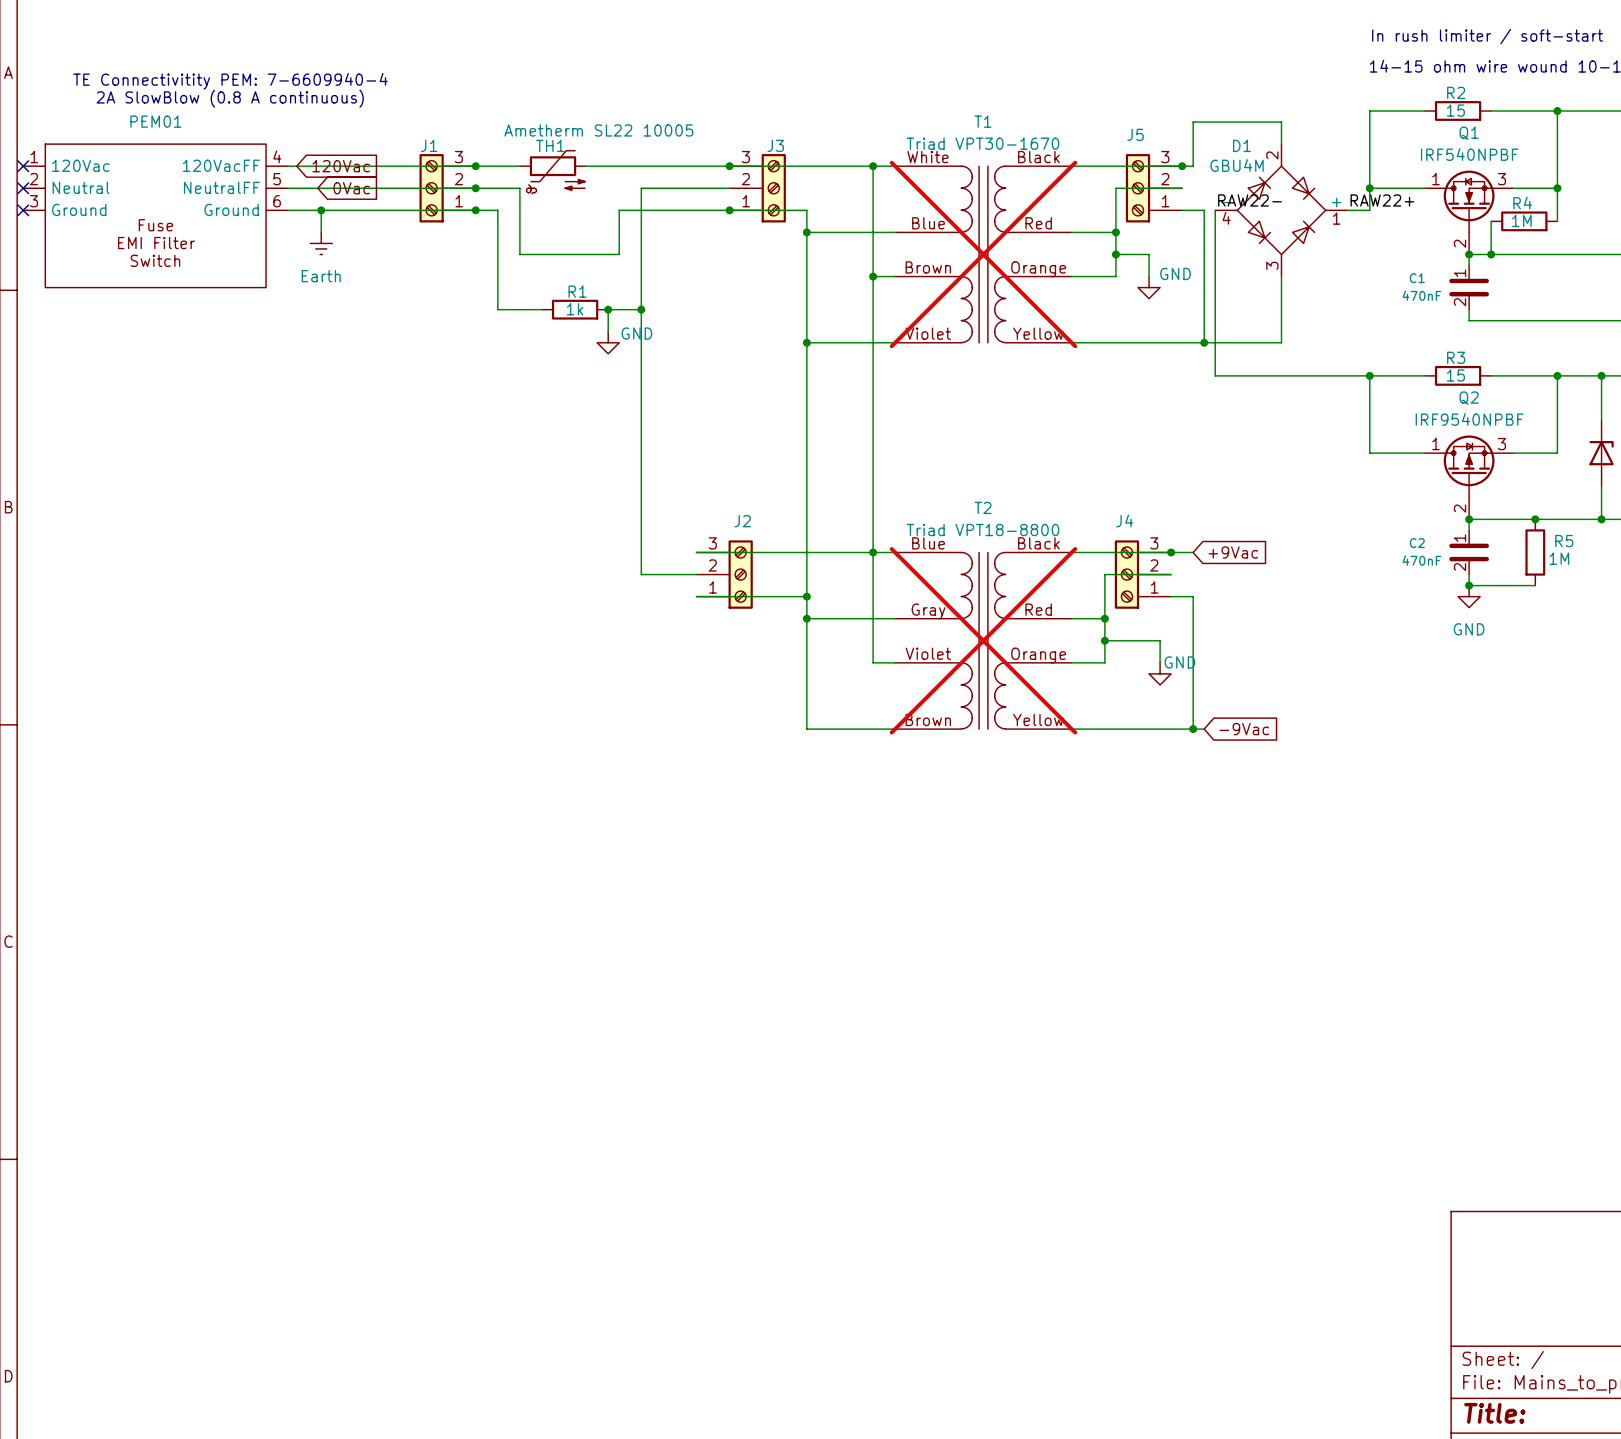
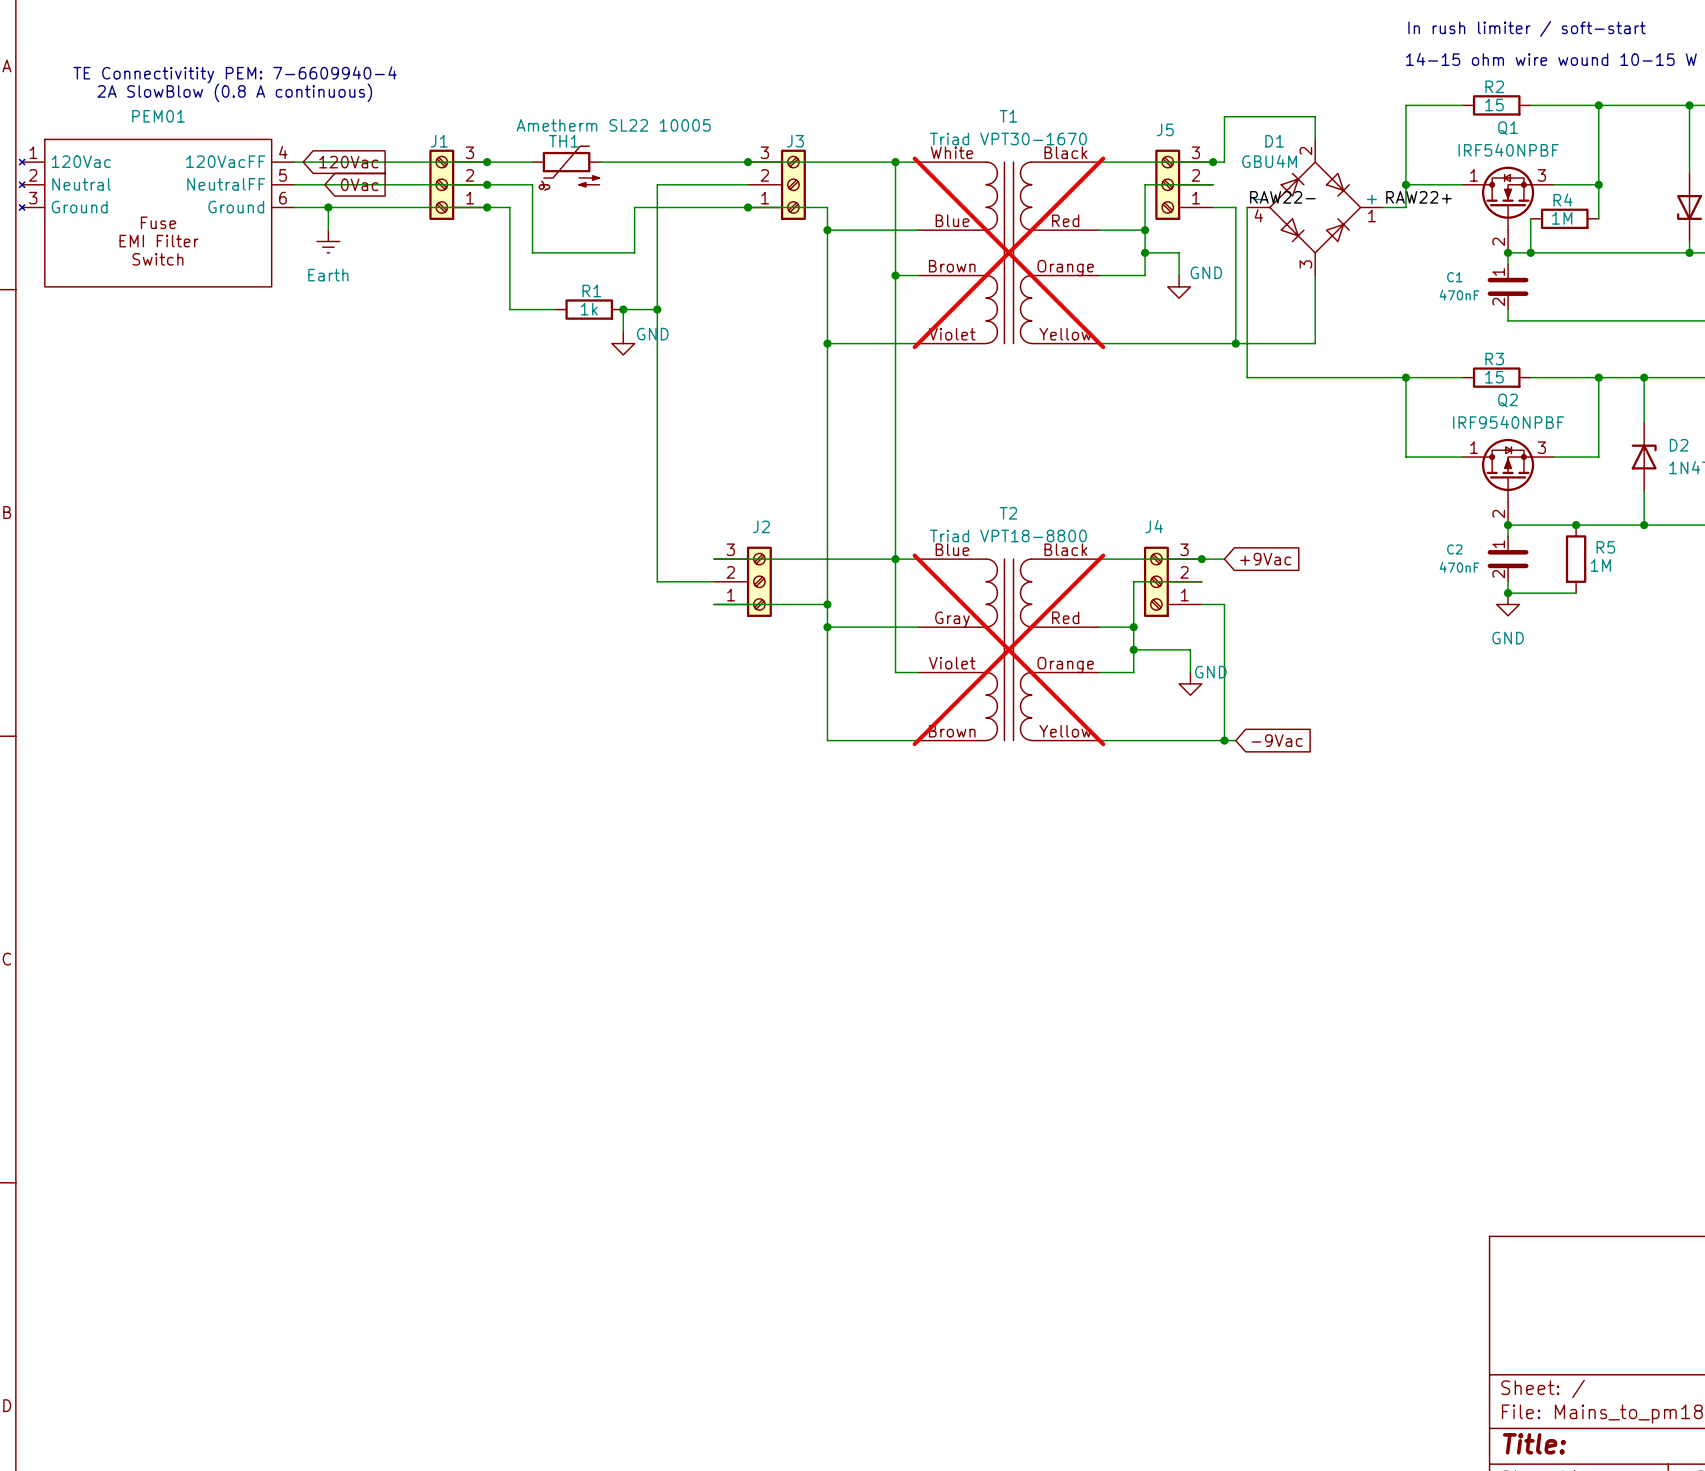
PEM01 shape: [23, 144, 289, 288] -> [19, 139, 295, 287]
no-connect mark: (23, 166) -> none
no-connect mark: (23, 188) -> none
no-connect mark: (23, 210) -> none

